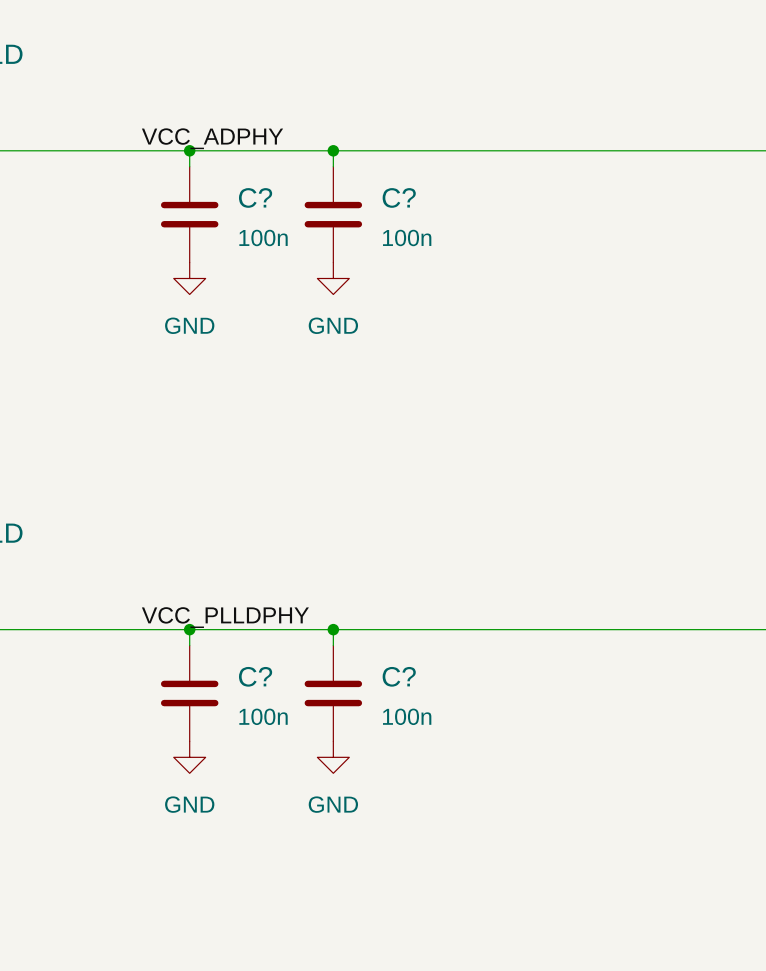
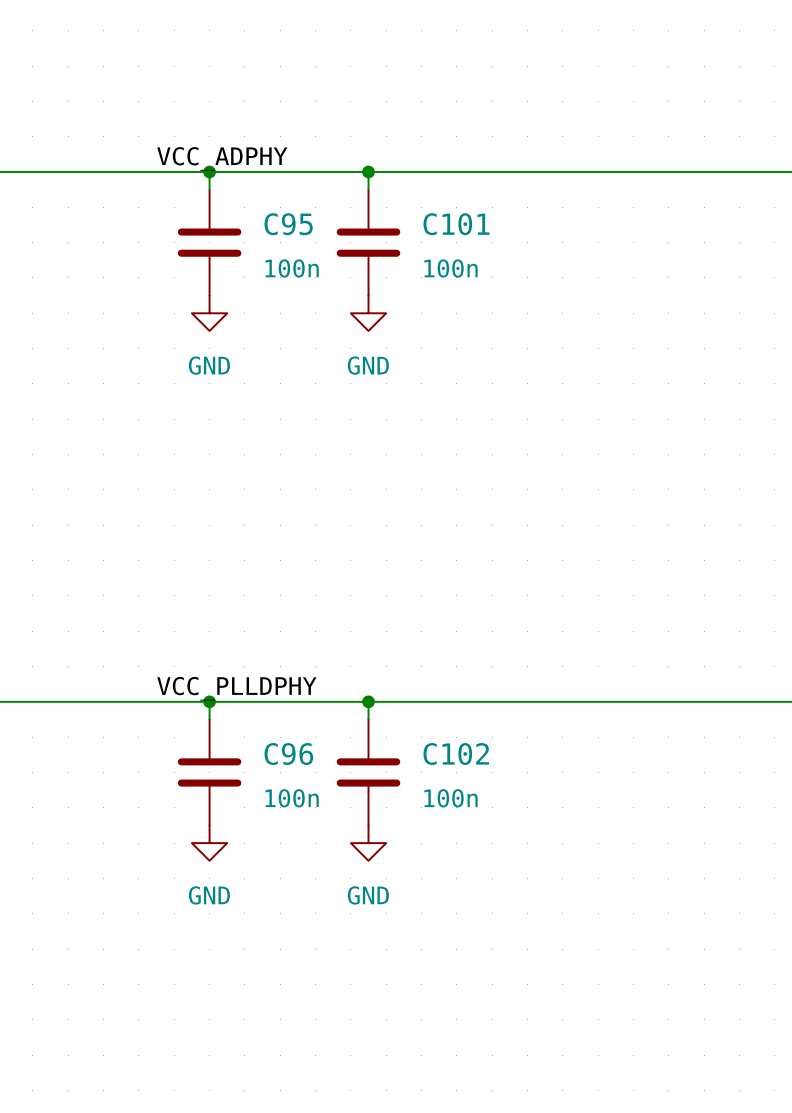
C? name: C? (255, 197) -> C95 (288, 224)
C? name: C? (399, 197) -> C101 (456, 224)
C? name: C? (255, 676) -> C96 (288, 754)
C? name: C? (399, 676) -> C102 (456, 754)

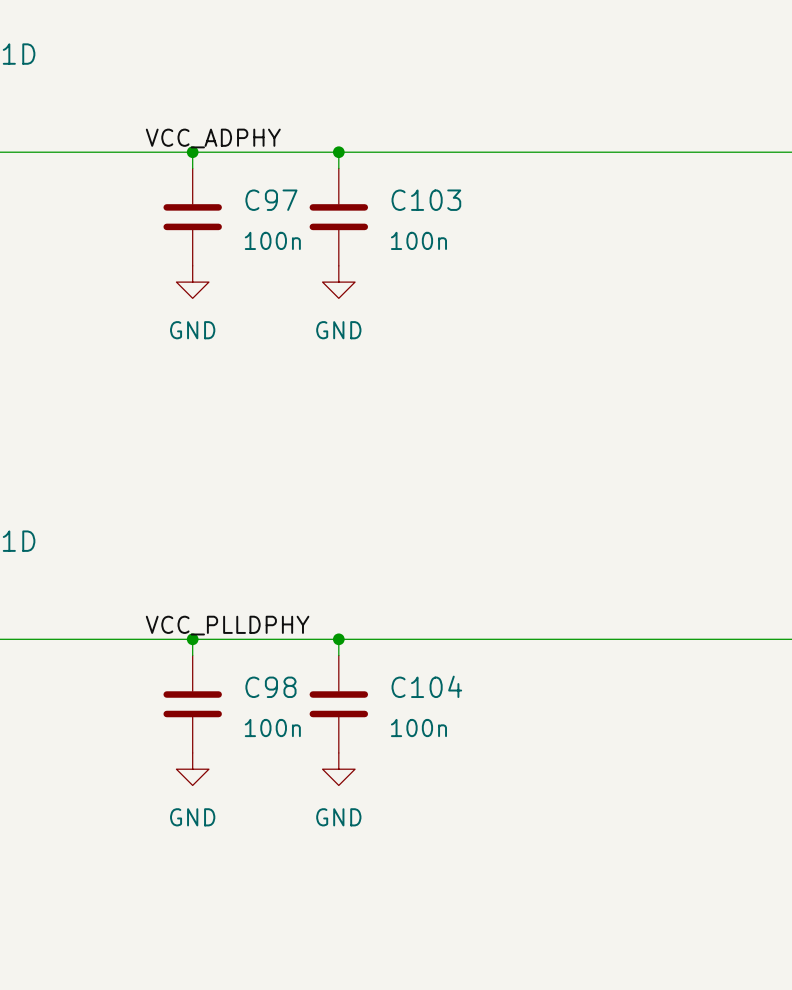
C95 name: C95 (288, 224) -> C97 (271, 200)
C101 name: C101 (456, 224) -> C103 (426, 200)
C96 name: C96 (288, 754) -> C98 (270, 687)
C102 name: C102 (456, 754) -> C104 (426, 686)

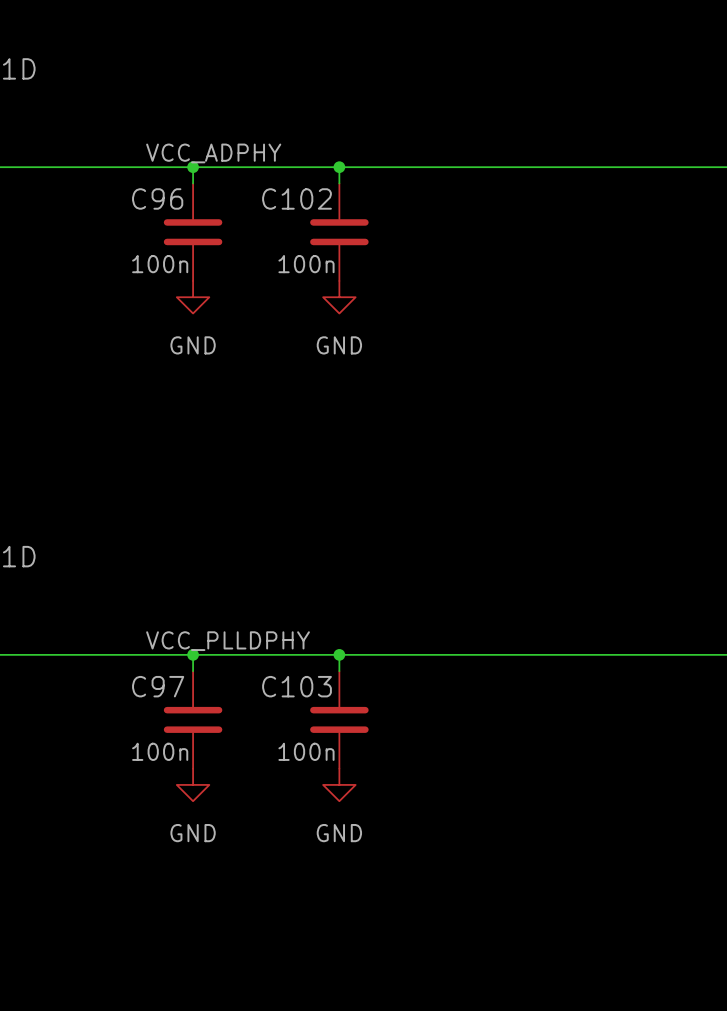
C97 name: C97 (271, 200) -> C96 (157, 198)
C103 name: C103 (426, 200) -> C102 (297, 198)
C97 text position: 100n (272, 240) -> 100n (160, 264)
C103 text position: 100n (418, 240) -> 100n (306, 264)
C104 name: C104 (426, 686) -> C103 (297, 686)
C98 name: C98 (270, 687) -> C97 (158, 686)
C98 text position: 100n (272, 728) -> 100n (160, 751)
C104 text position: 100n (418, 728) -> 100n (306, 751)

